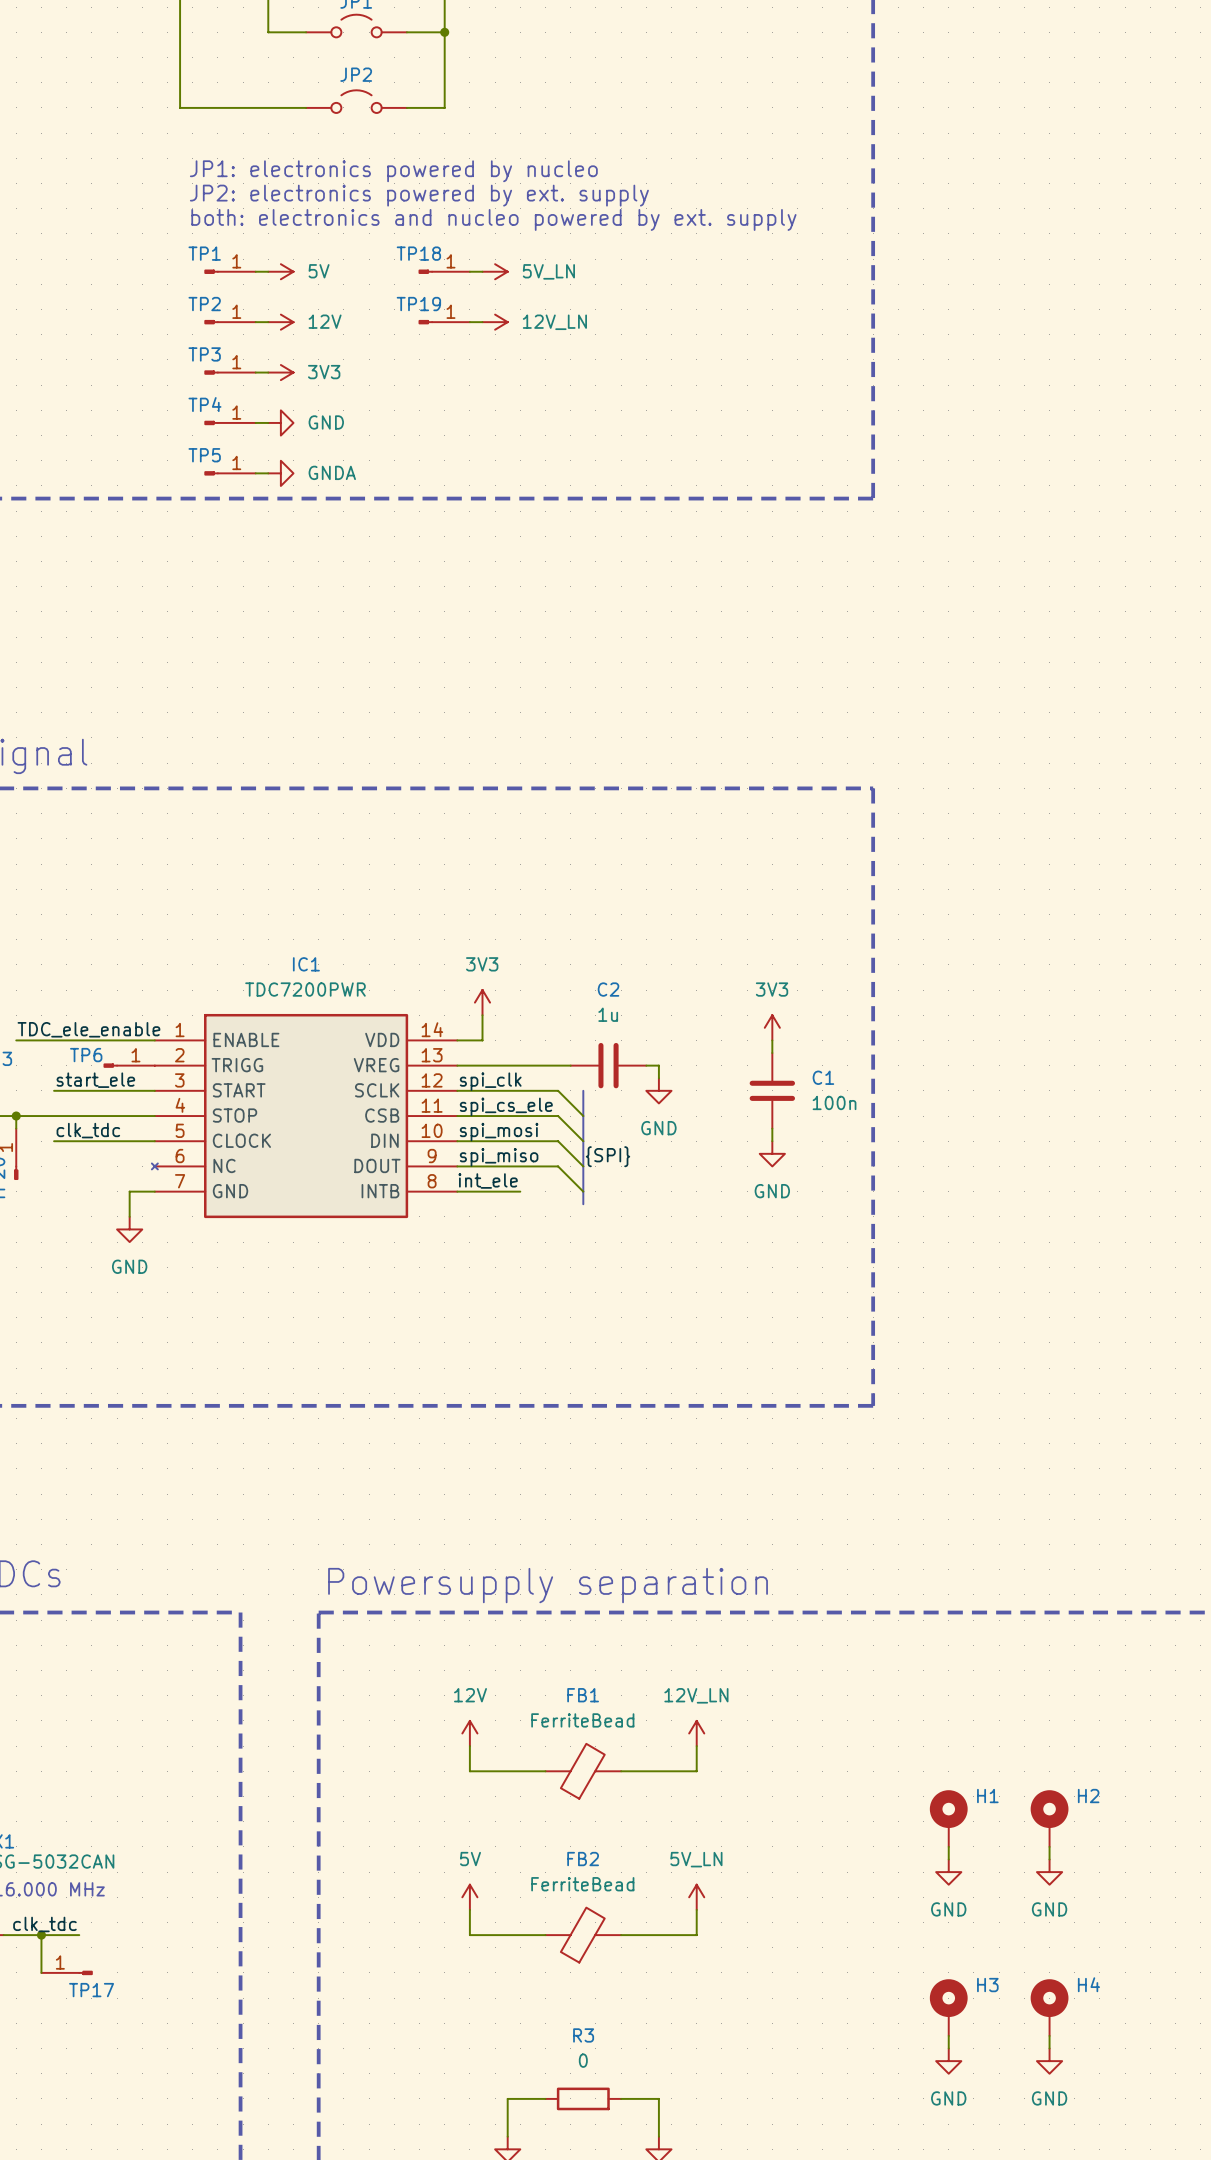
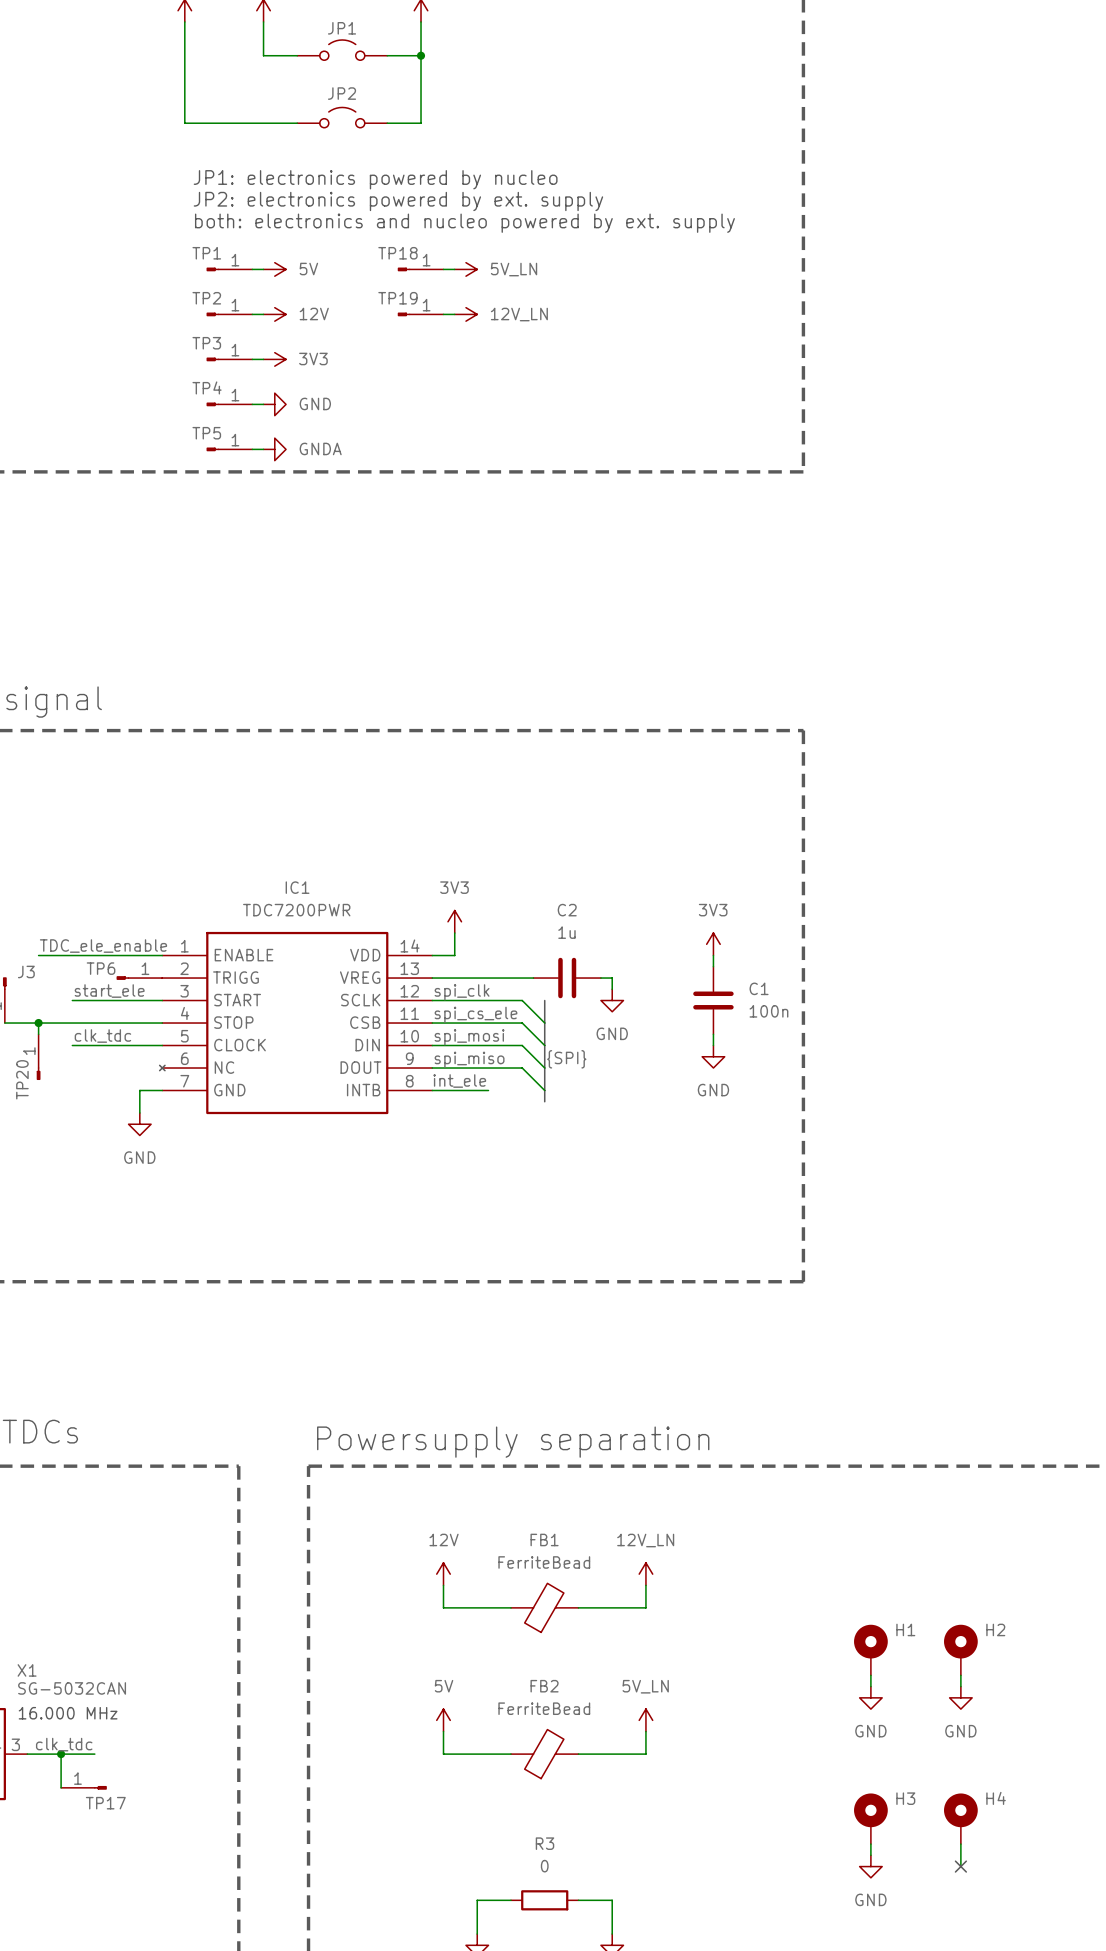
power symbol: GND (1049, 2061) -> none
no-connect mark: none -> (960, 1866)

